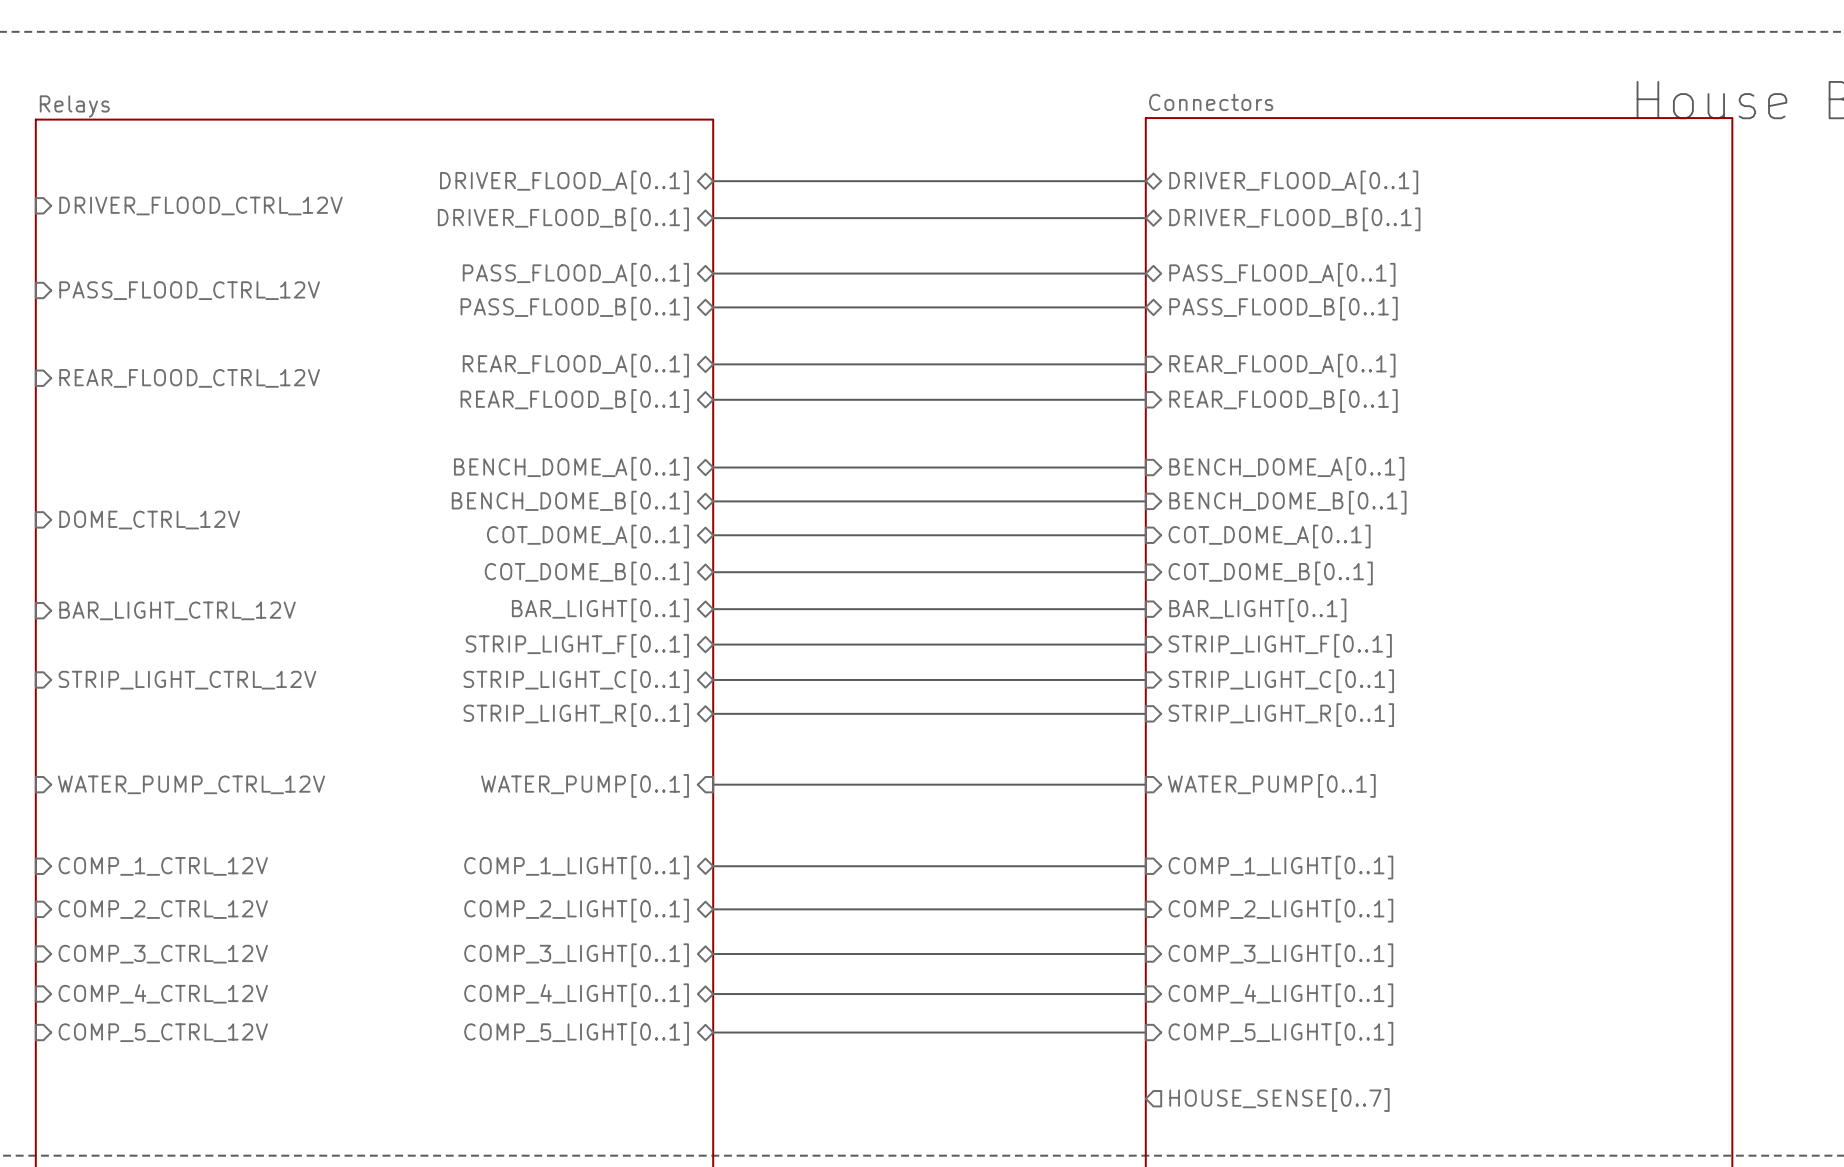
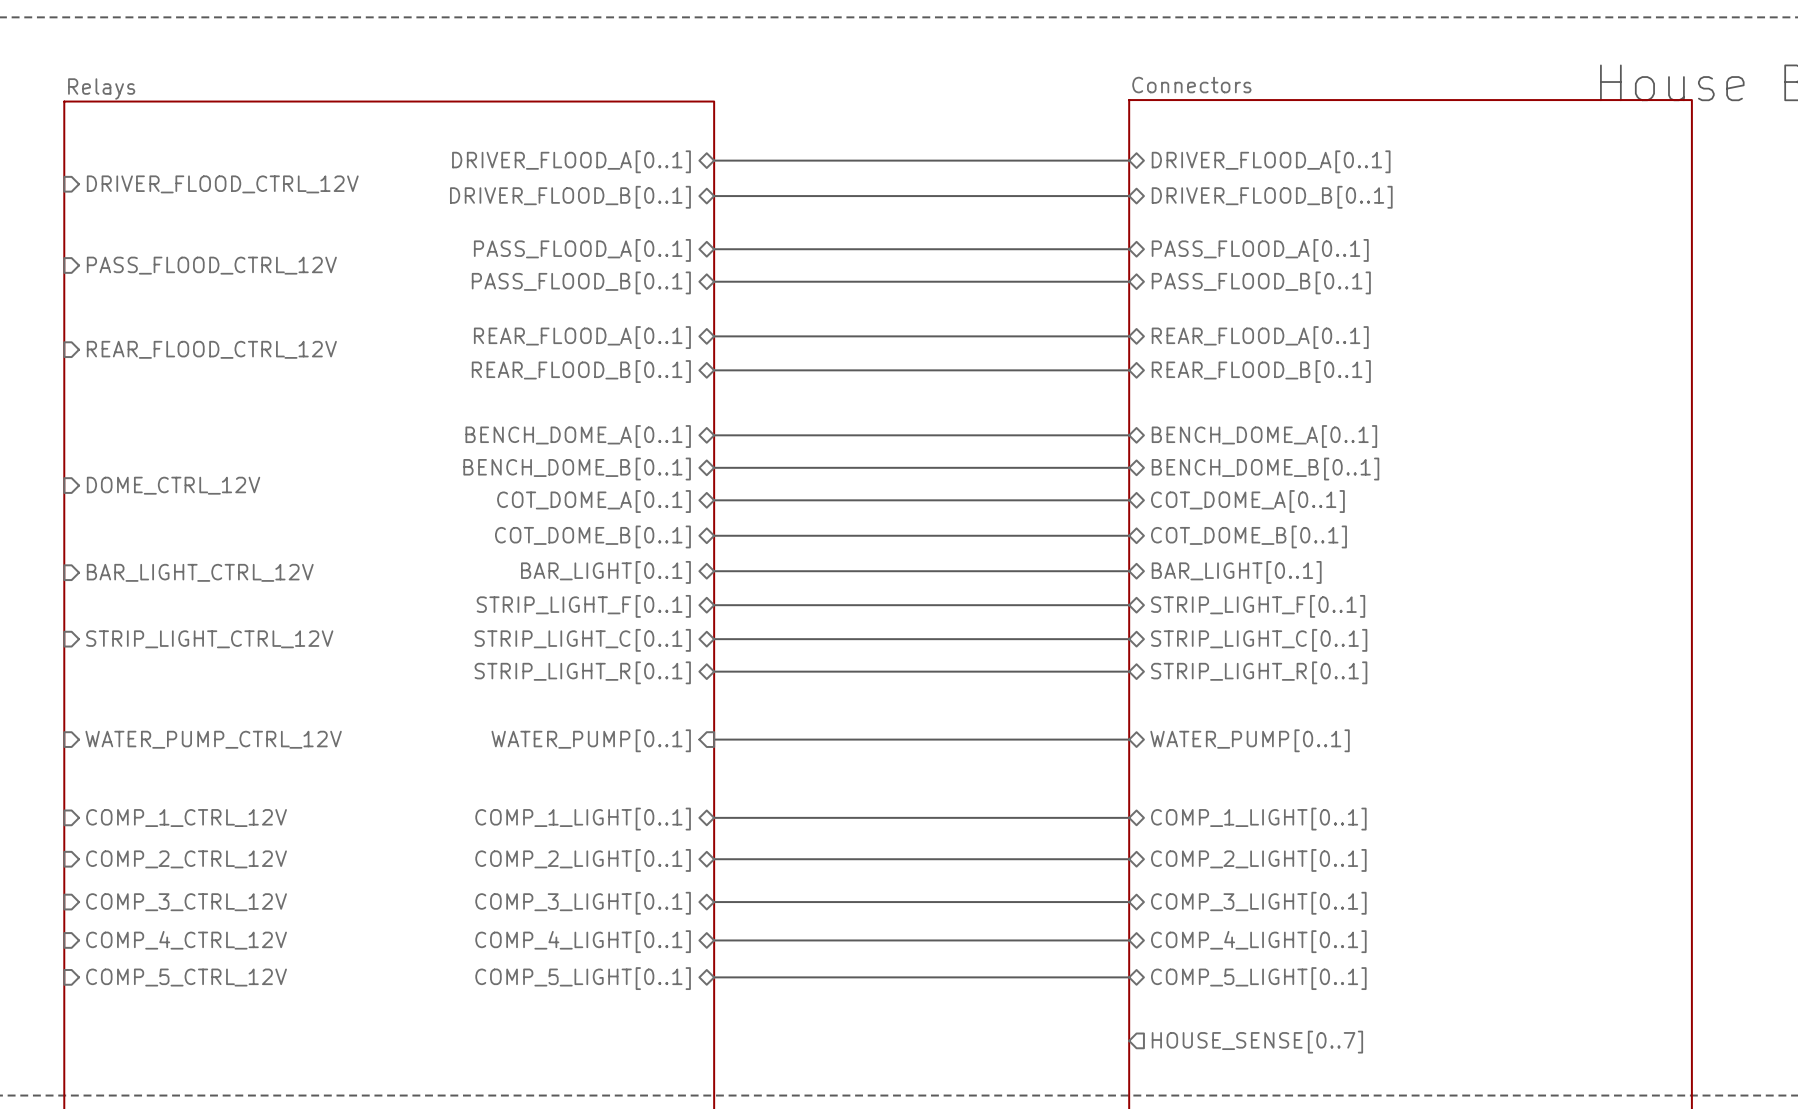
sheet pin shape: input (1282, 365) -> bidirectional (1260, 337)
sheet pin shape: input (1283, 401) -> bidirectional (1261, 371)
sheet pin shape: input (1286, 468) -> bidirectional (1264, 436)
sheet pin shape: input (1287, 502) -> bidirectional (1265, 469)
sheet pin shape: input (1269, 536) -> bidirectional (1247, 501)
sheet pin shape: input (1270, 573) -> bidirectional (1248, 536)
sheet pin shape: input (1257, 610) -> bidirectional (1236, 572)
sheet pin shape: input (1280, 645) -> bidirectional (1258, 606)
sheet pin shape: input (1281, 681) -> bidirectional (1259, 640)
sheet pin shape: input (1281, 715) -> bidirectional (1259, 672)
sheet pin shape: input (1271, 785) -> bidirectional (1250, 740)
sheet pin shape: input (1280, 867) -> bidirectional (1258, 819)
sheet pin shape: input (1280, 910) -> bidirectional (1258, 860)
sheet pin shape: input (1280, 955) -> bidirectional (1258, 903)
sheet pin shape: input (1280, 995) -> bidirectional (1258, 941)
sheet pin shape: input (1280, 1033) -> bidirectional (1258, 978)

